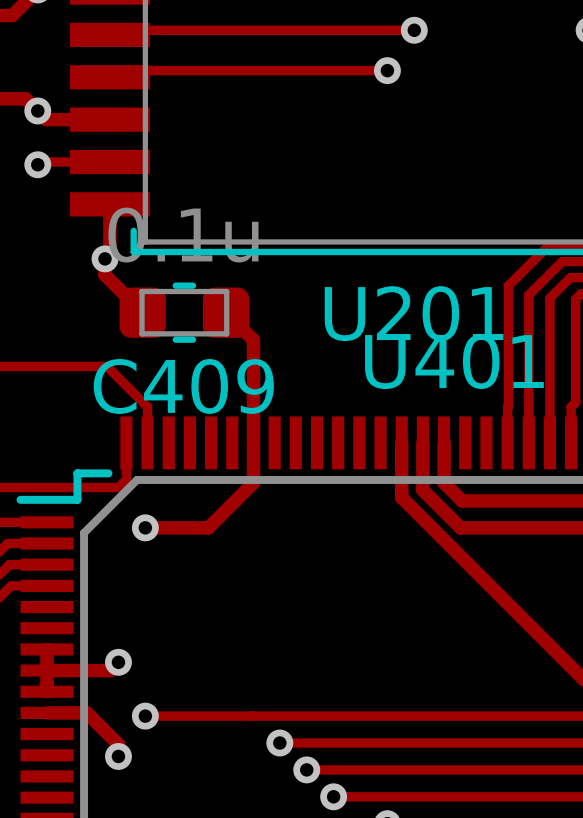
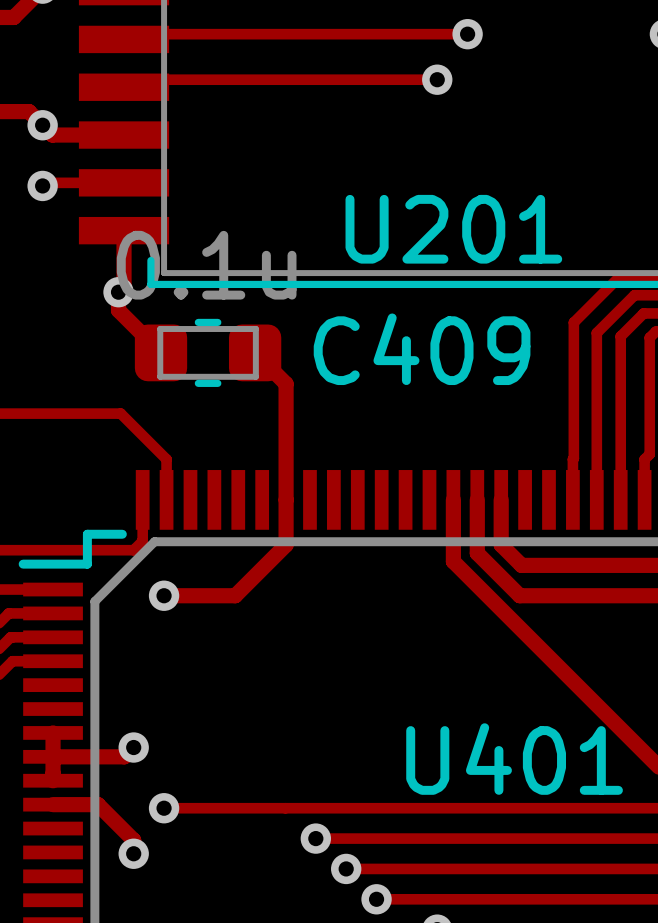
U201 name position: U201 (414, 313) -> U201 (453, 229)
U401 name position: U401 (454, 361) -> U401 (514, 759)
C409 name position: C409 (183, 386) -> C409 (422, 349)

